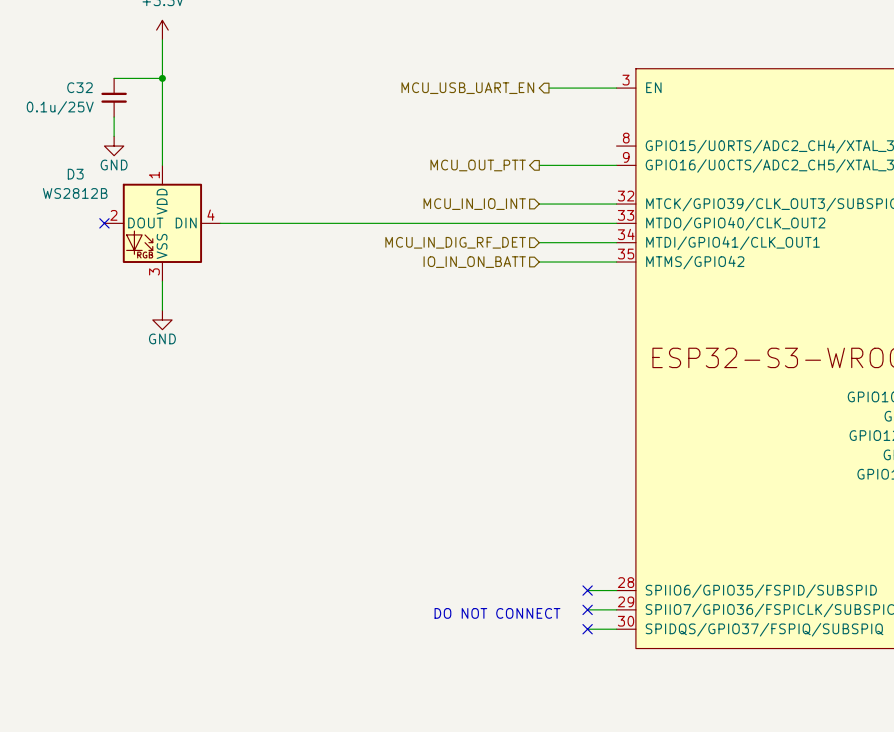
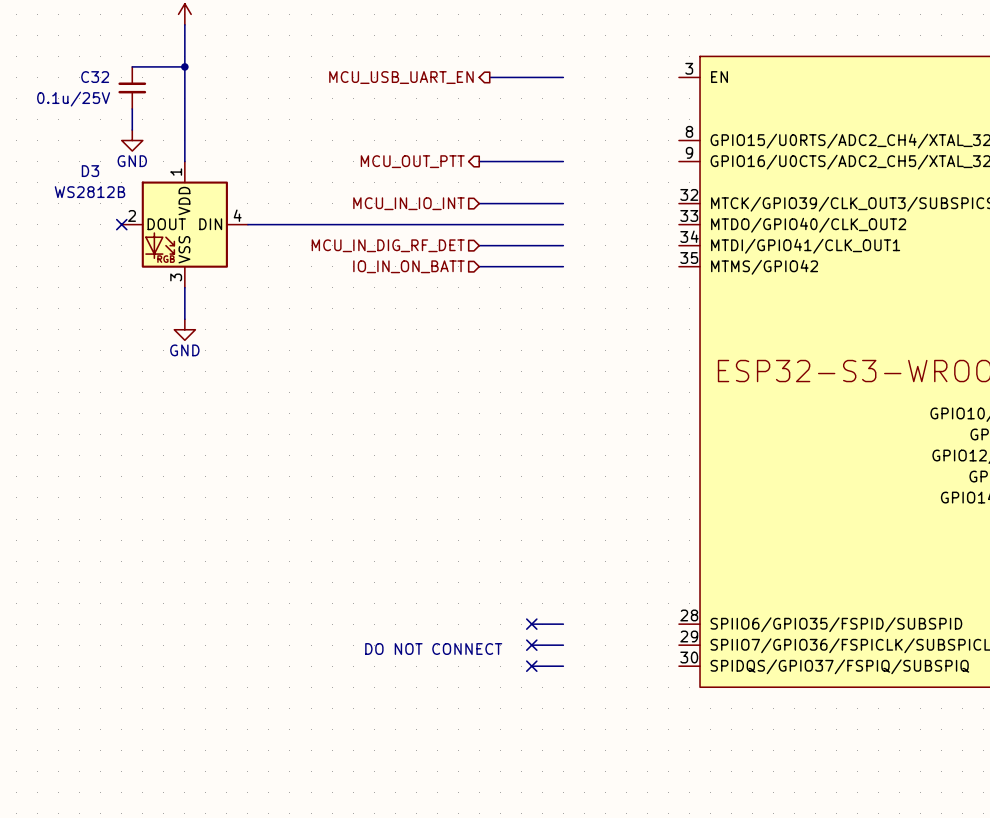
hierarchical label position: MCU_USB_UART_EN (467, 88) -> MCU_USB_UART_EN (401, 77)
wire: (548, 88) (616, 88) -> (489, 77) (563, 77)
hierarchical label position: MCU_OUT_PTT (478, 165) -> MCU_OUT_PTT (412, 161)
wire: (539, 165) (616, 165) -> (479, 161) (563, 161)
hierarchical label position: MCU_IN_IO_INT (474, 204) -> MCU_IN_IO_INT (408, 203)
wire: (539, 204) (616, 204) -> (479, 203) (563, 203)
wire: (510, 223) (616, 223) -> none
hierarchical label position: MCU_IN_DIG_RF_DET (455, 242) -> MCU_IN_DIG_RF_DET (388, 245)
wire: (539, 242) (616, 242) -> (479, 245) (563, 245)
hierarchical label position: IO_IN_ON_BATT (474, 262) -> IO_IN_ON_BATT (408, 266)
wire: (539, 262) (616, 262) -> (479, 266) (563, 266)
no-connect mark: none -> (531, 624)
wire: (587, 590) (616, 590) -> (531, 624) (563, 624)
no-connect mark: (587, 590) -> none
no-connect mark: none -> (531, 645)
wire: (587, 609) (616, 609) -> (531, 645) (563, 645)
no-connect mark: (587, 609) -> none
text position: DO NOT CONNECT (497, 613) -> DO NOT CONNECT (433, 649)
no-connect mark: none -> (531, 666)
wire: (587, 629) (616, 629) -> (531, 666) (563, 666)
no-connect mark: (587, 629) -> none

